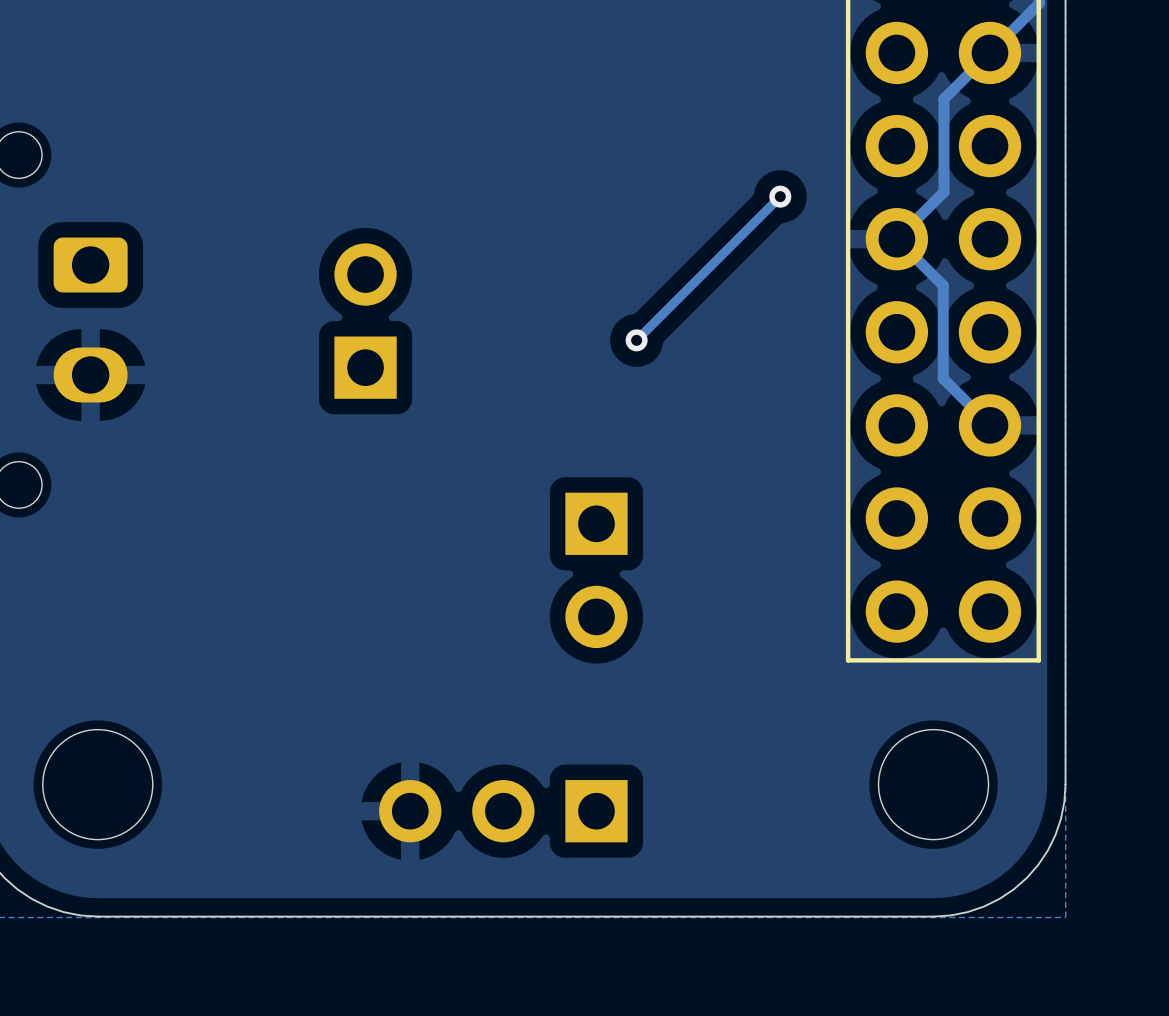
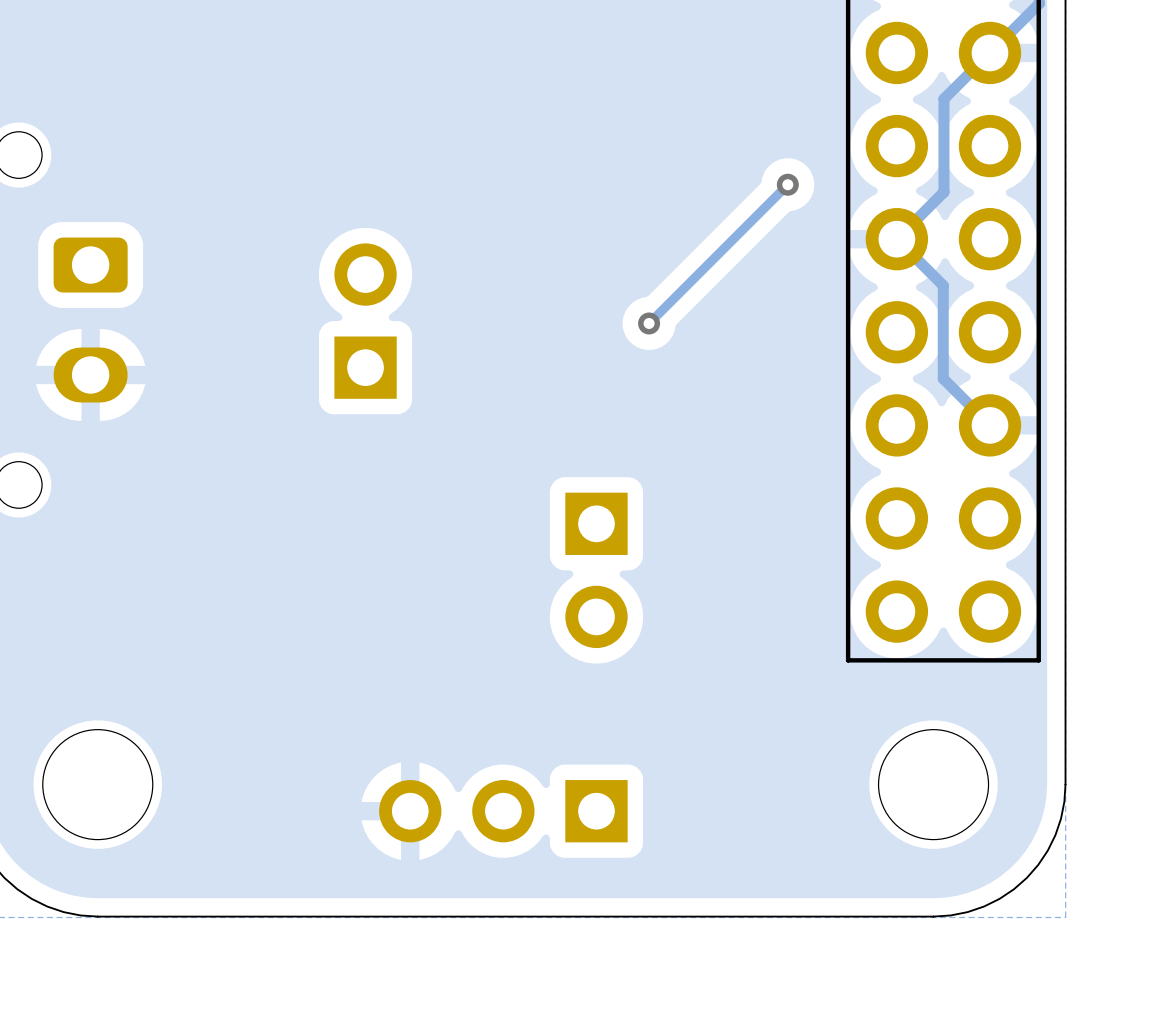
track: none -> (787, 184) (649, 323)
track: (780, 196) (636, 340) -> none
via position: (780, 196) -> (787, 184)
via position: (636, 340) -> (649, 323)

